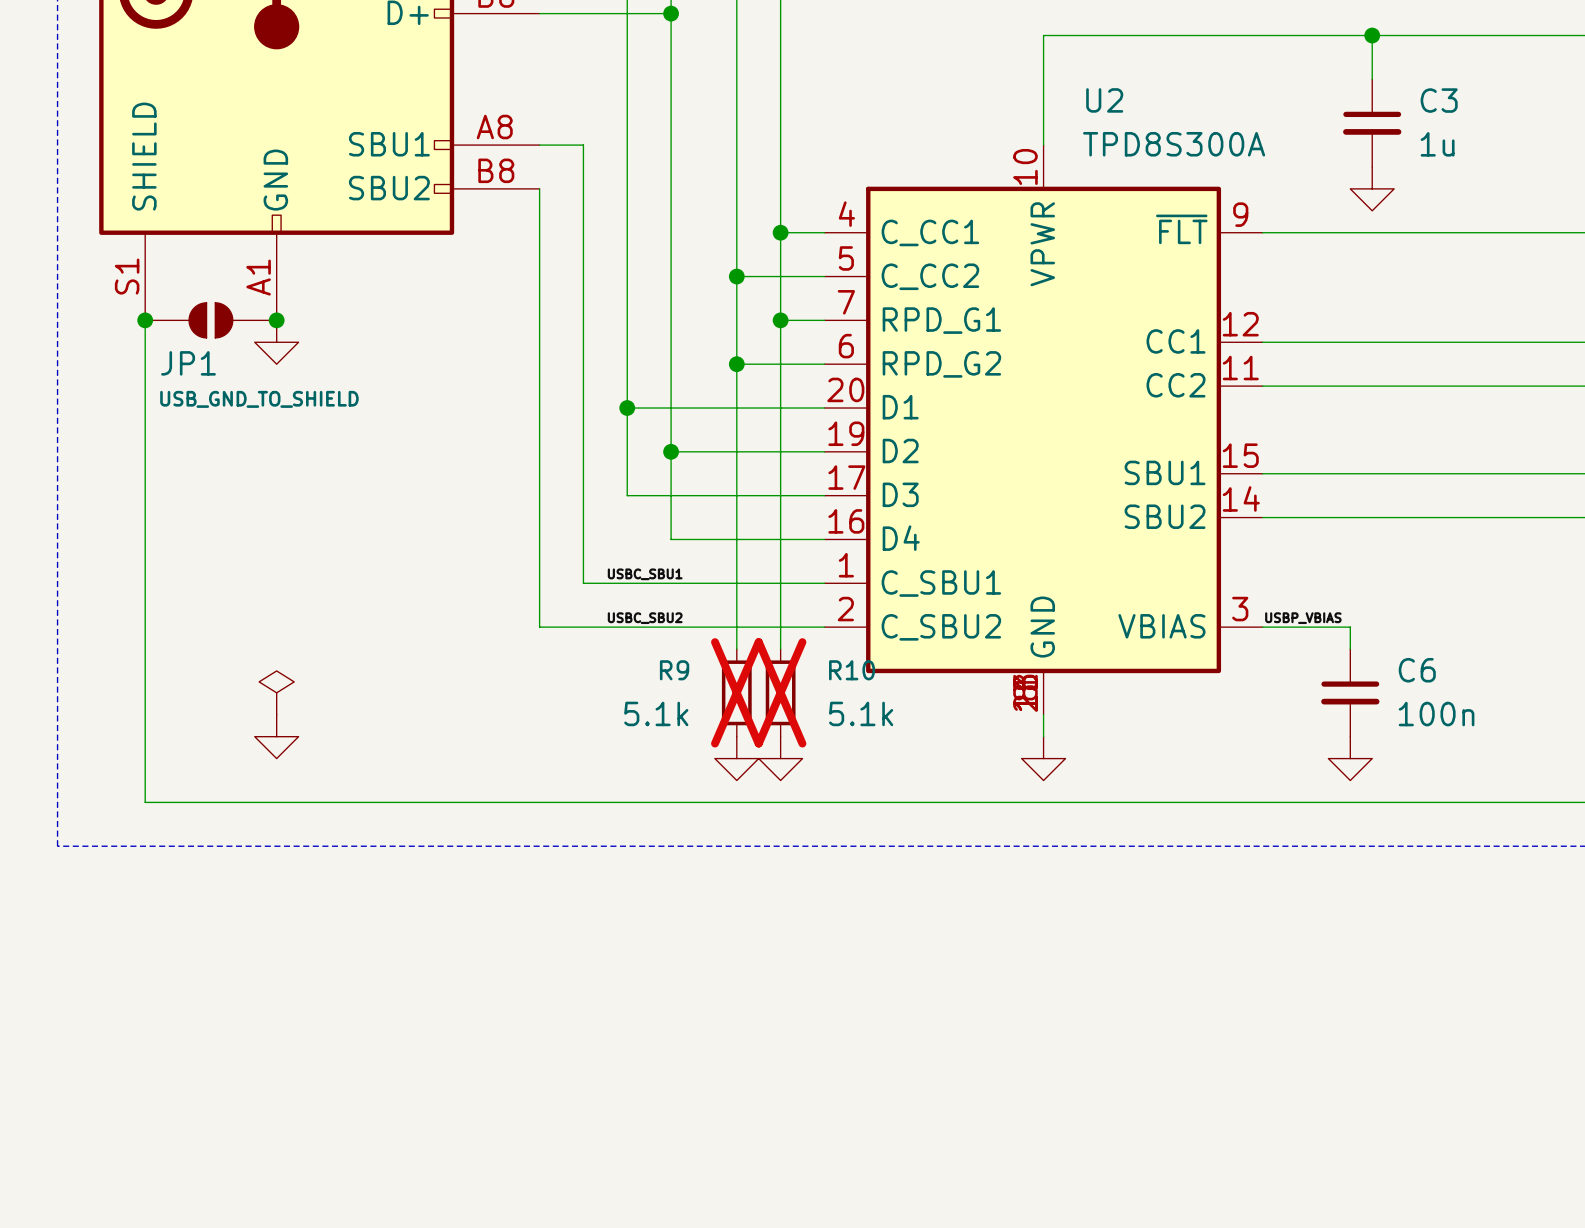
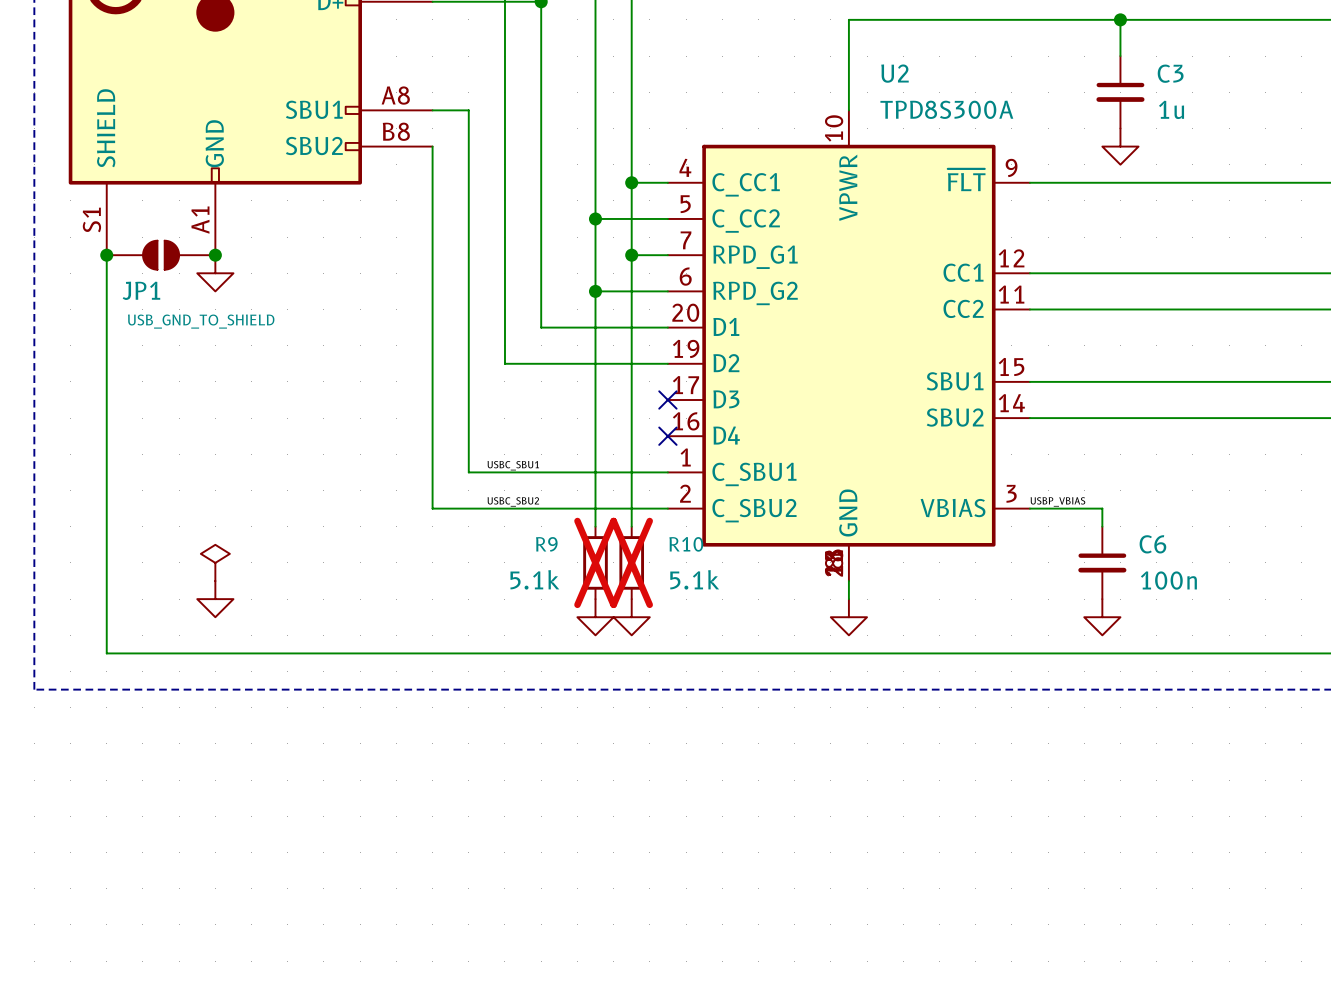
wire: (627, 408) (671, 408) (671, 539) (824, 539) -> none
junction: (627, 408) -> none
wire: (627, 451) (627, 495) (824, 495) -> (504, 363) (541, 363)
junction: (671, 451) -> none
no-connect mark: none -> (667, 400)
no-connect mark: none -> (667, 436)

